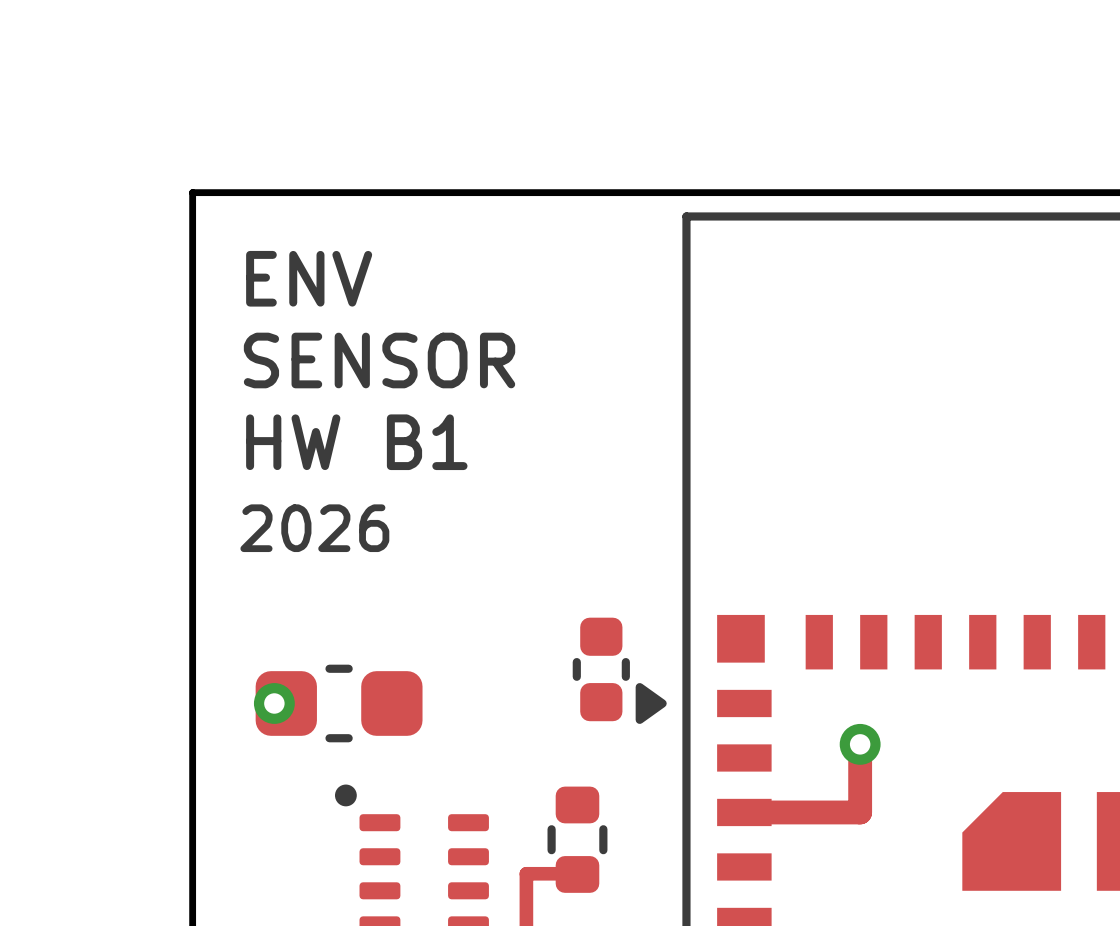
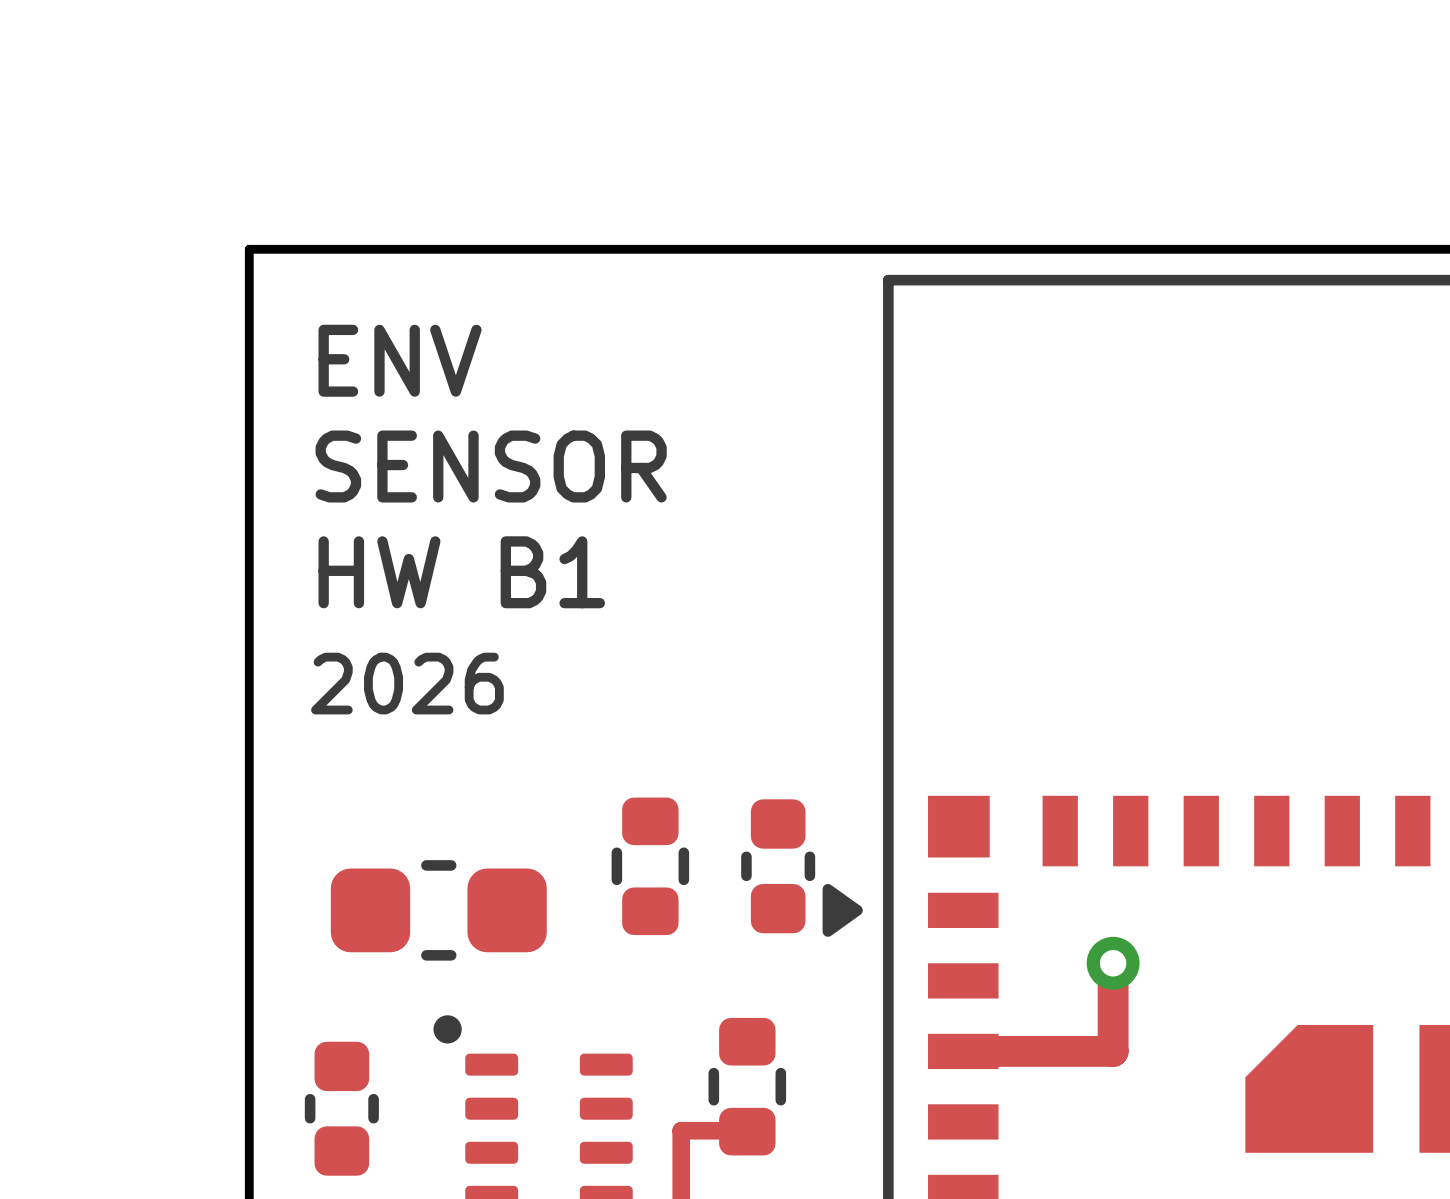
part: none -> (650, 866)
via: (274, 703) -> none
part: none -> (341, 1108)

